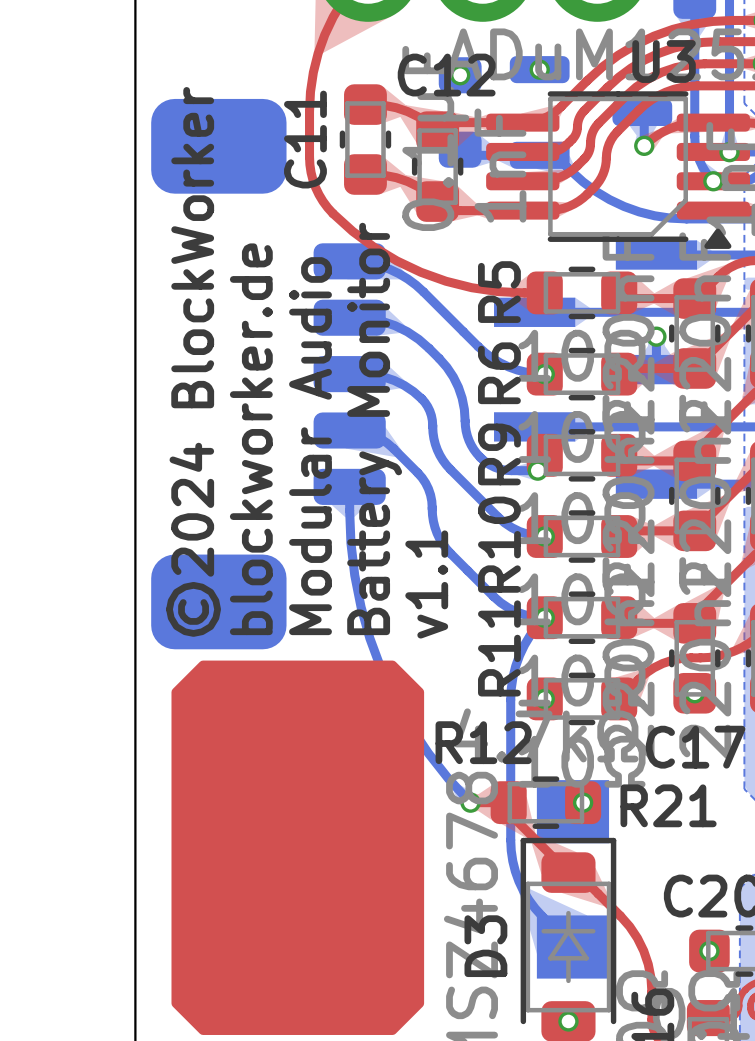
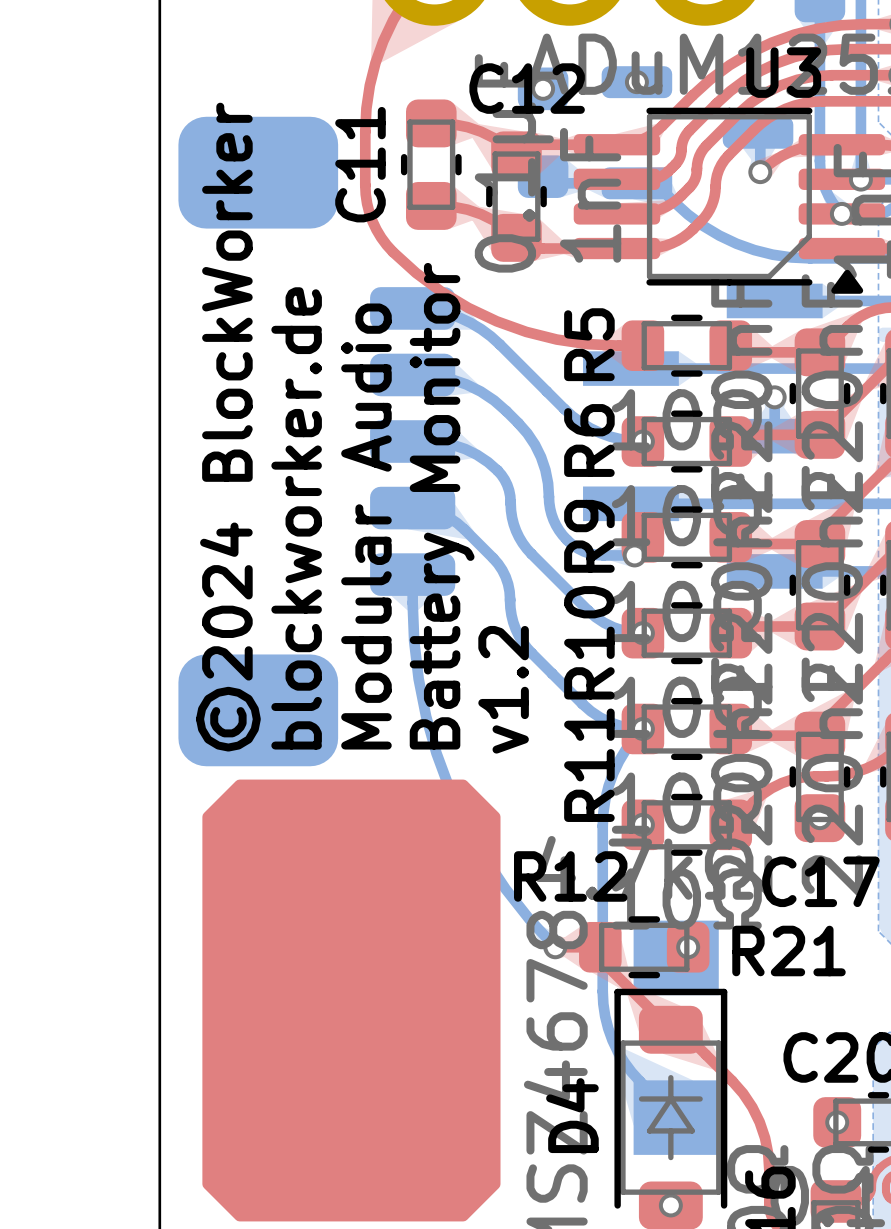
text: v1.1 (426, 584) -> v1.2 (503, 689)
D3 name: D3 (485, 946) -> D4 (572, 1115)

